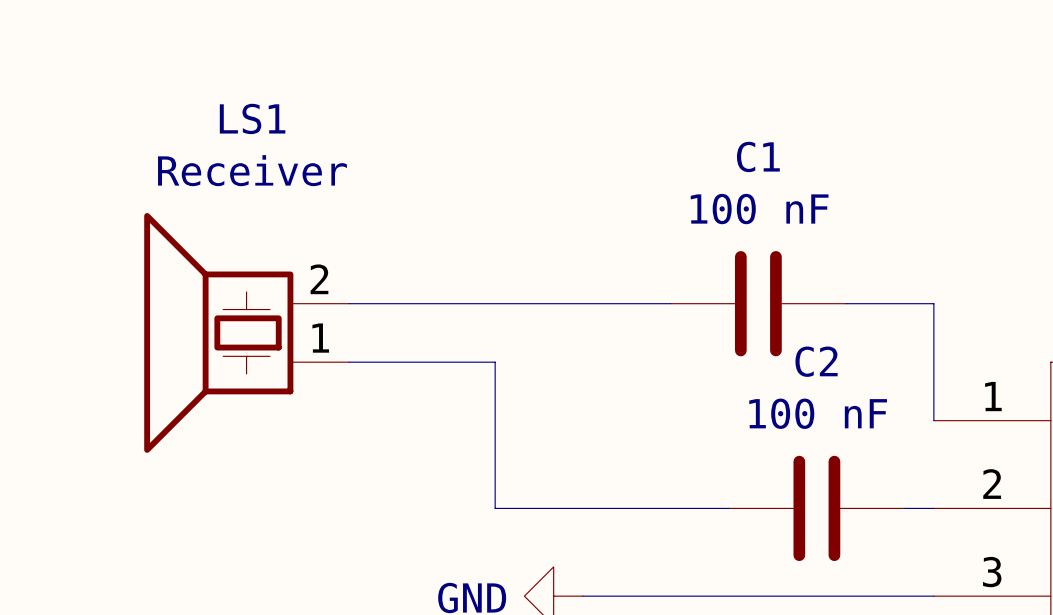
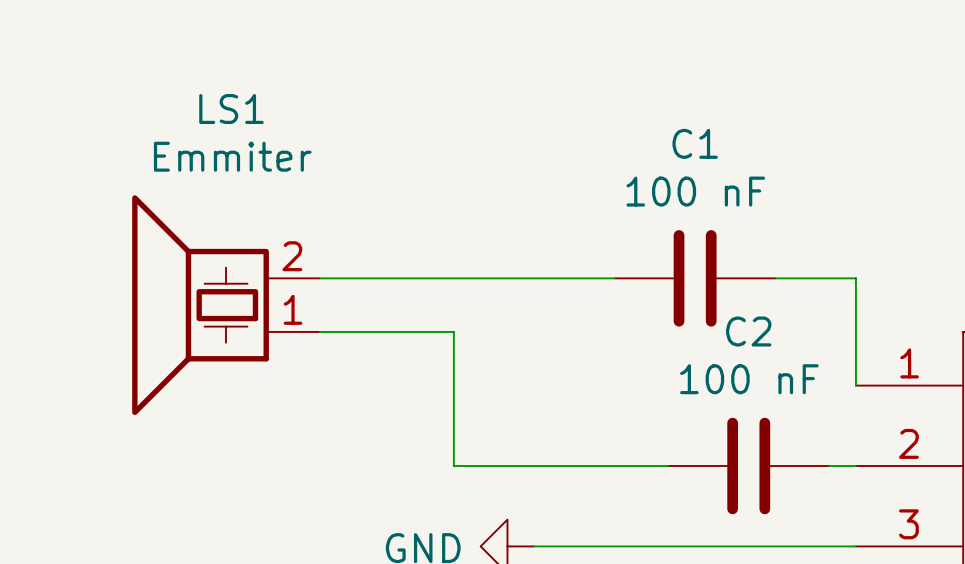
LS1 value: Receiver (252, 170) -> Emmiter (232, 156)

